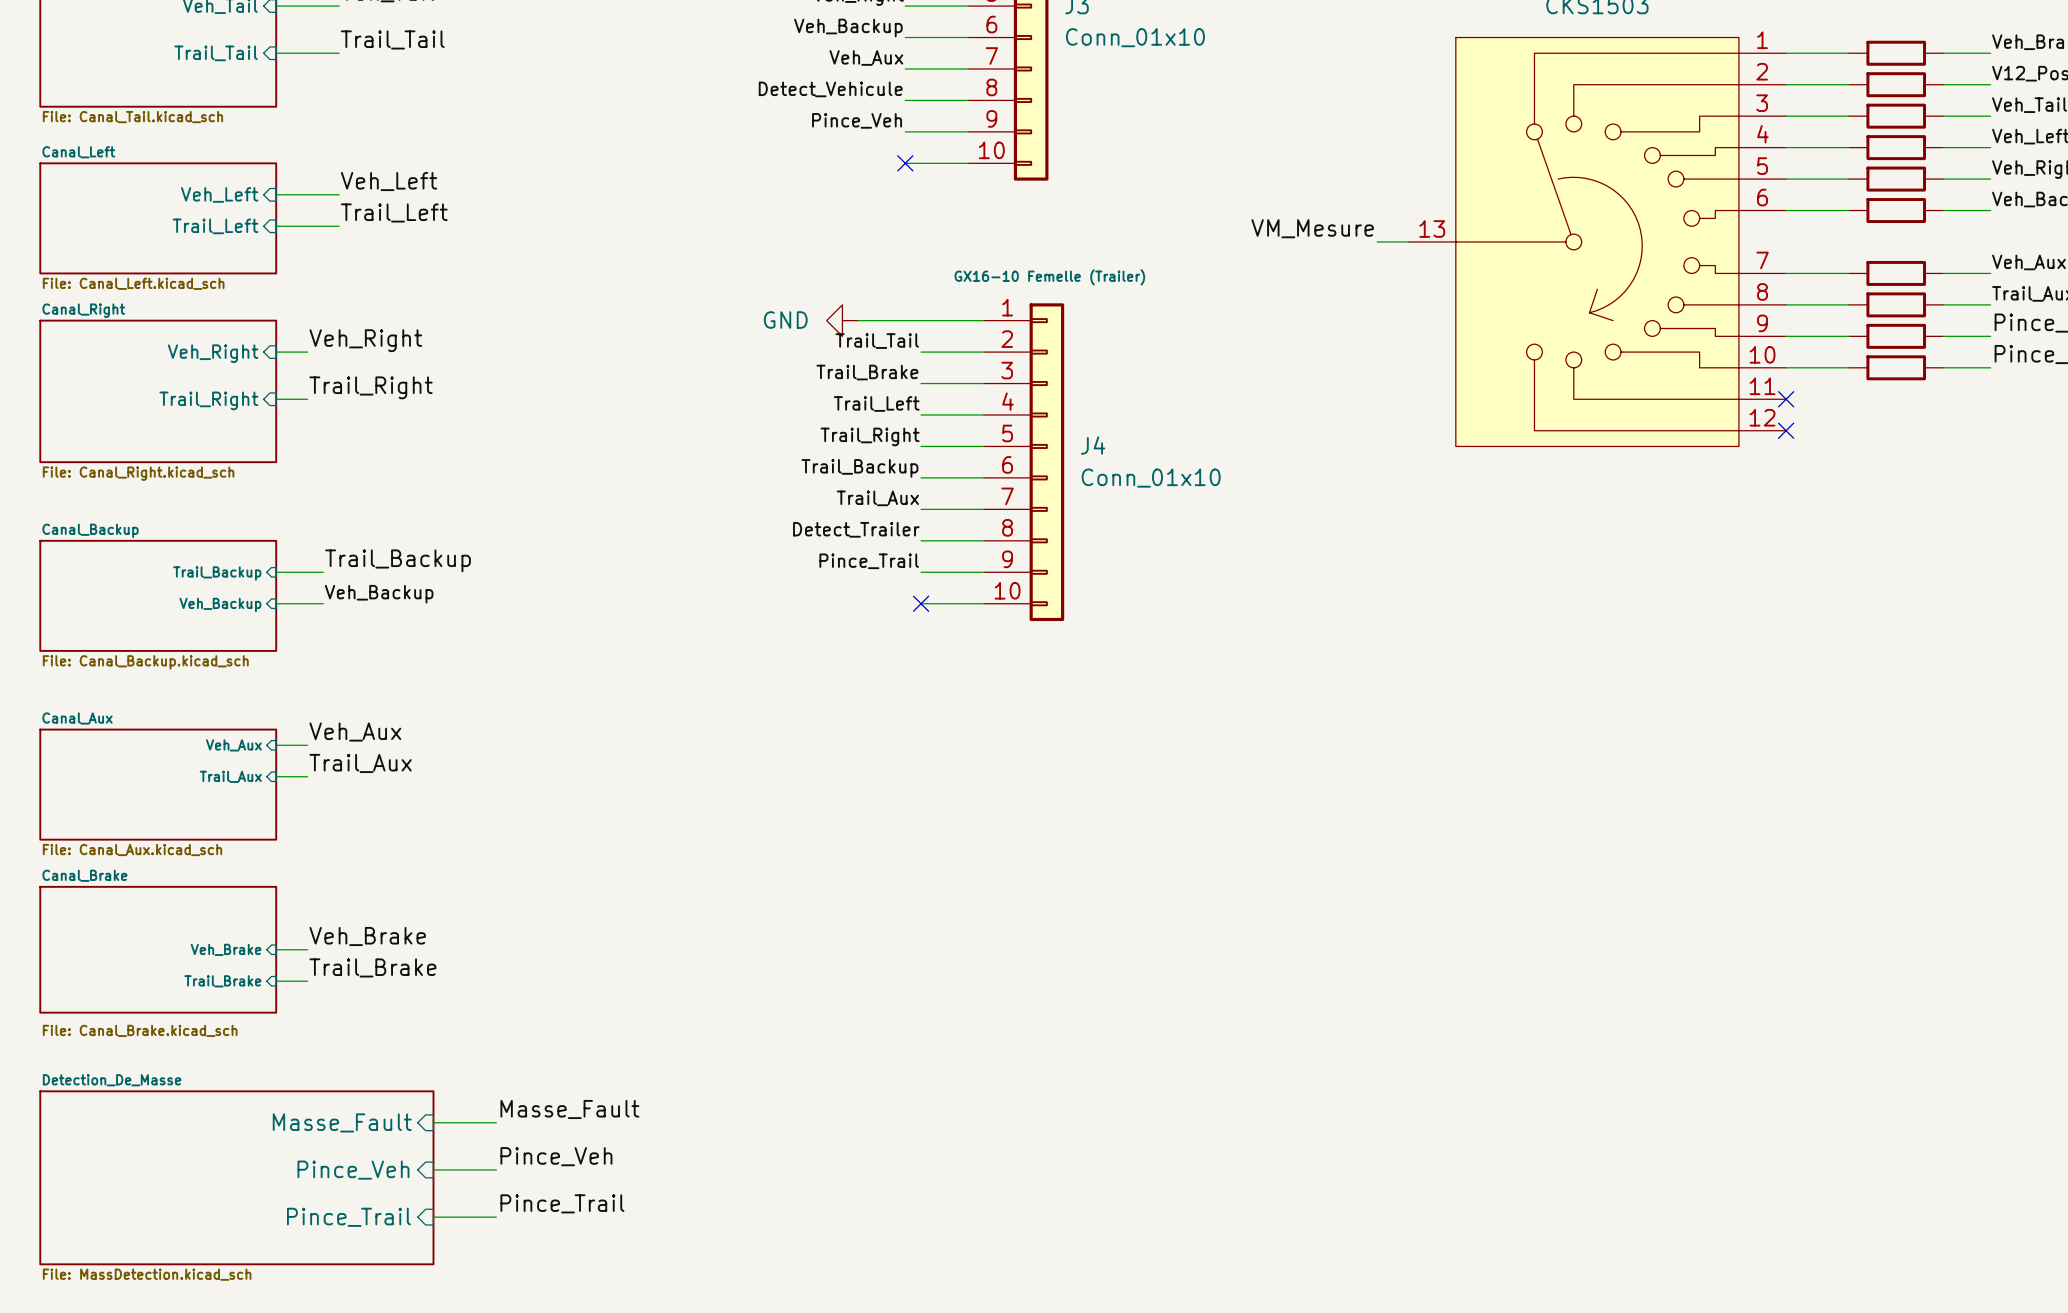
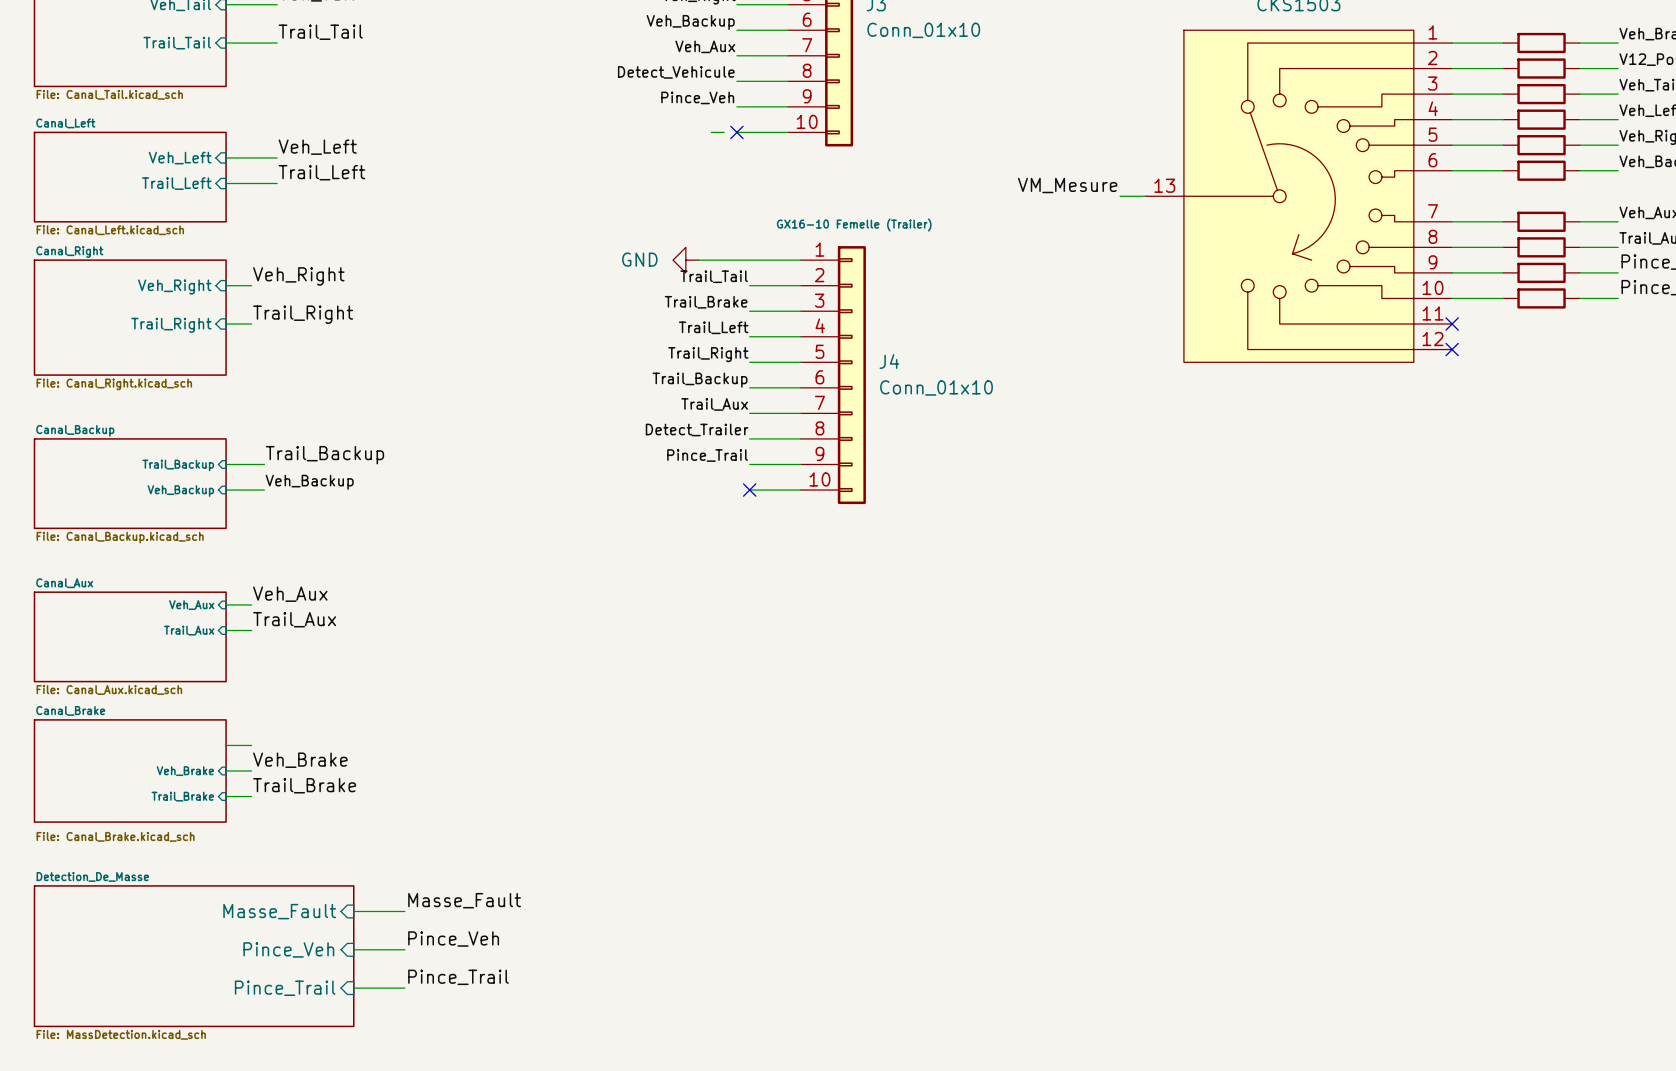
wire: none -> (711, 132) (724, 132)
wire: none -> (226, 745) (251, 745)

